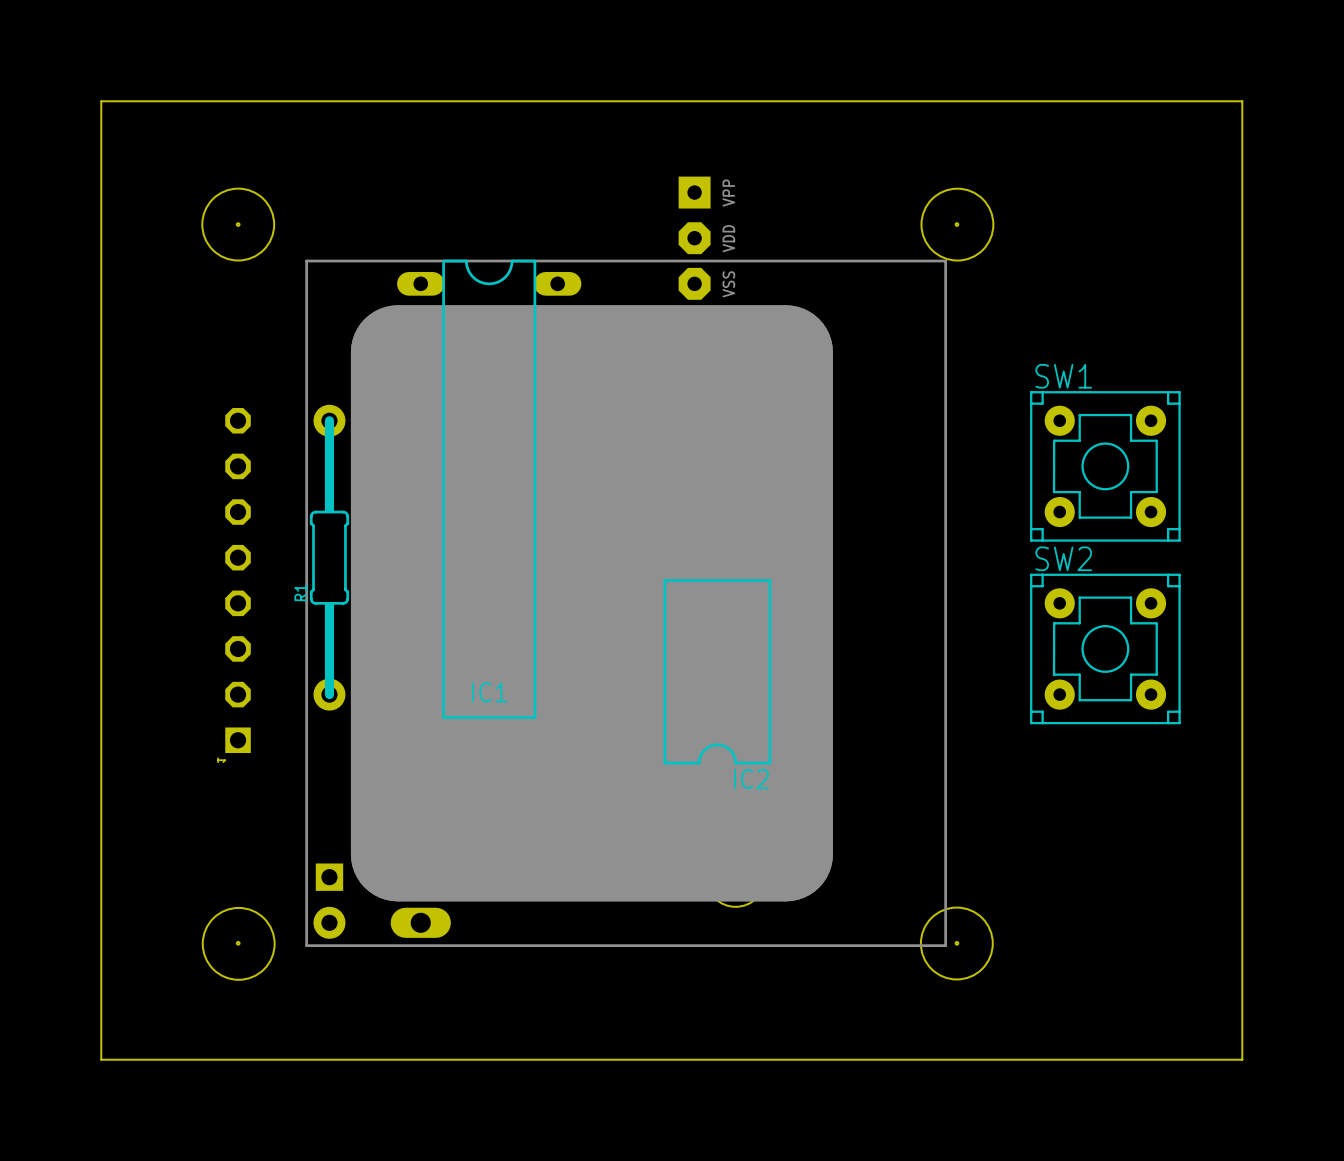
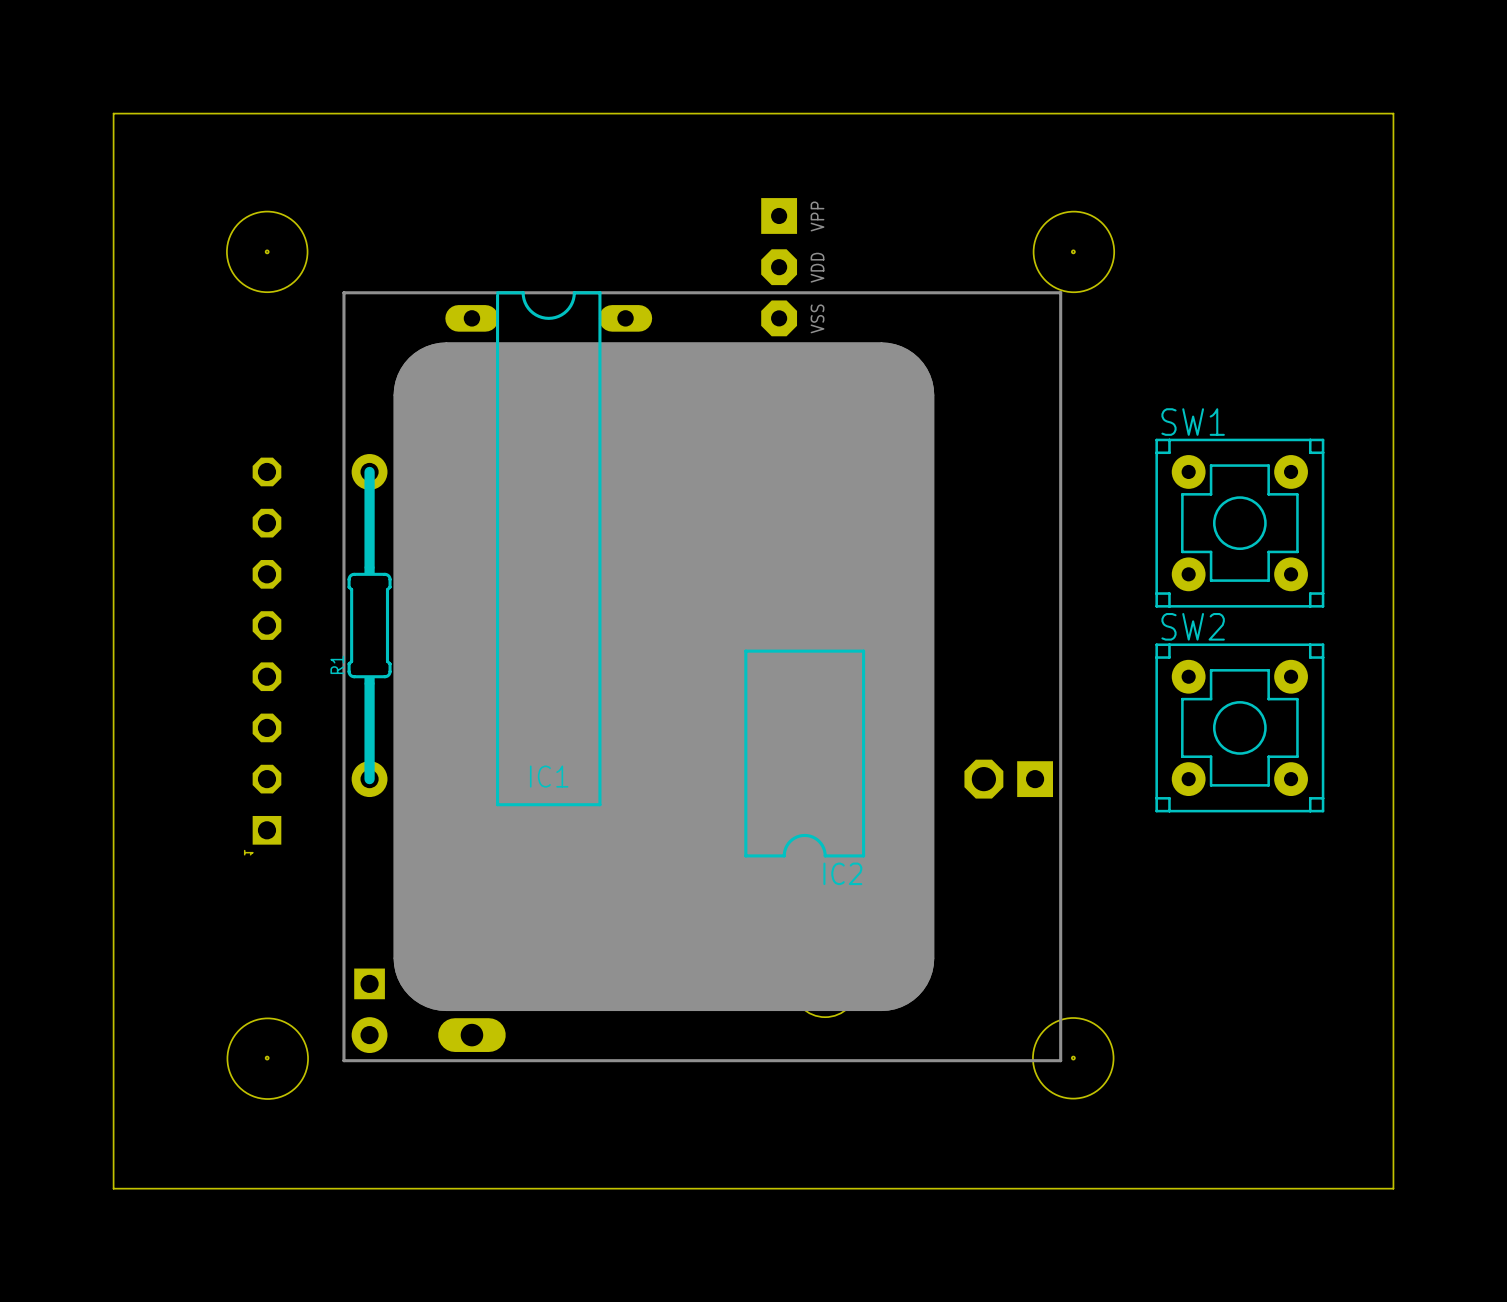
part: none -> (1008, 779)

